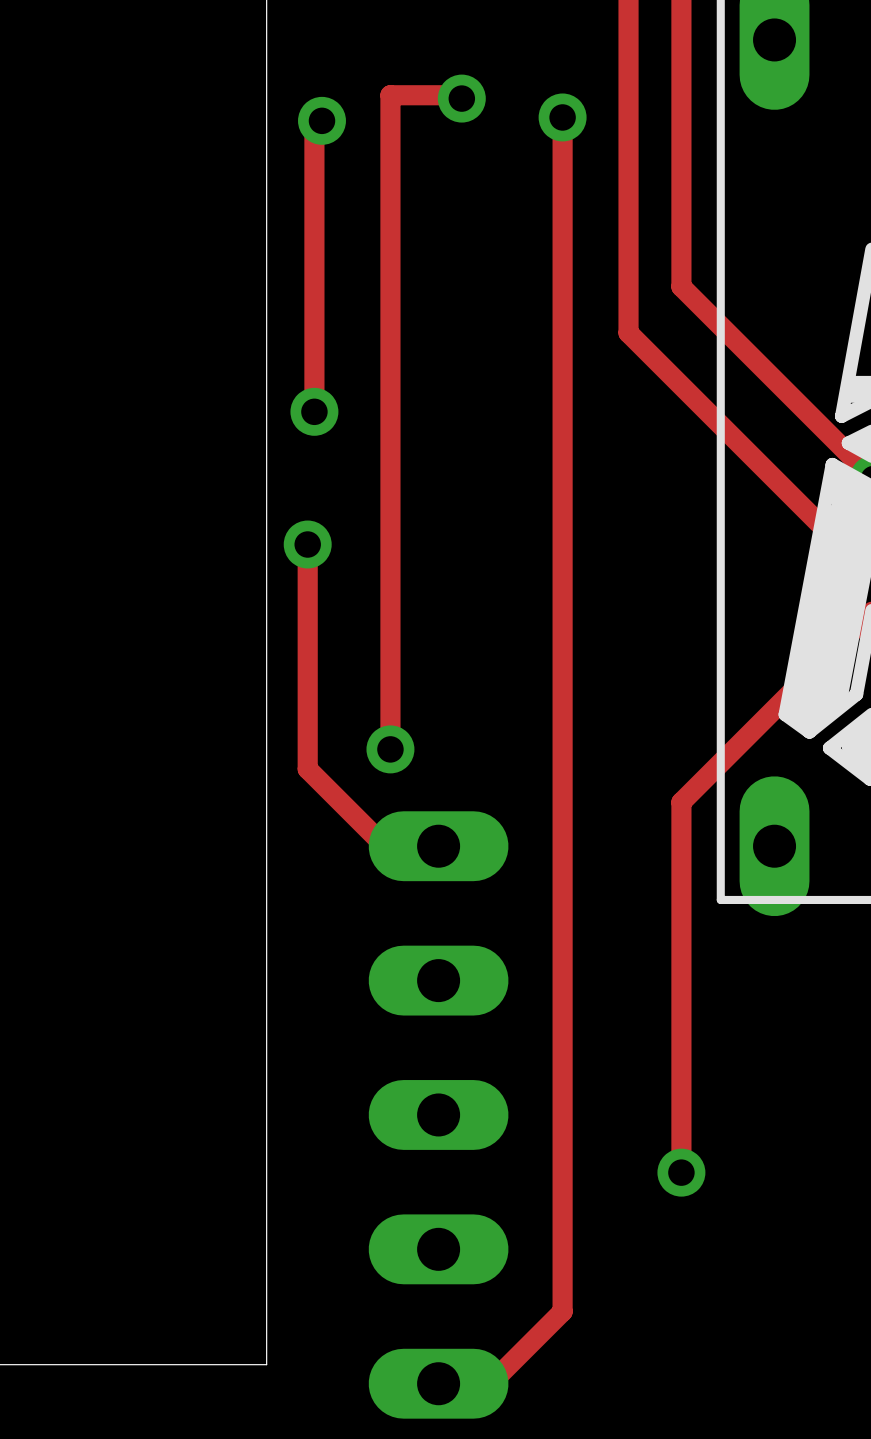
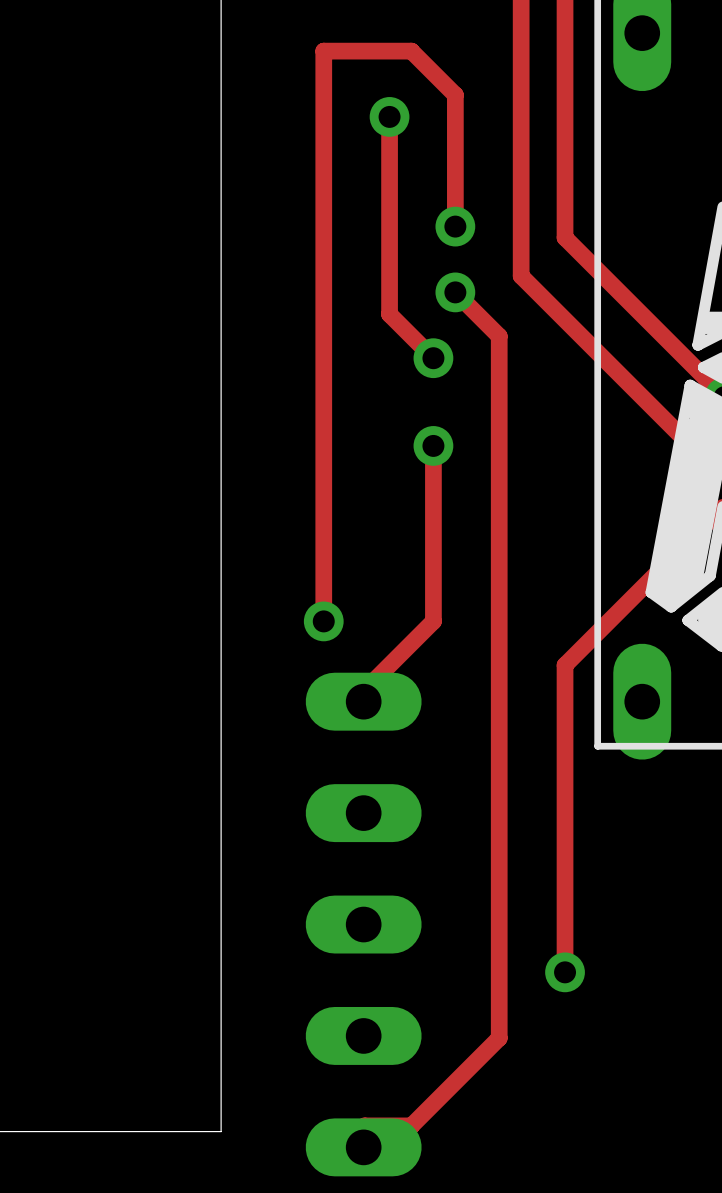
track: (390, 95) (458, 95) (461, 98) -> (323, 78) (323, 51) (411, 51) (455, 94) (455, 226)
via position: (461, 98) -> (389, 116)
track: (562, 117) (562, 1311) (490, 1383) (438, 1383) -> (455, 292) (499, 336) (499, 1038) (411, 1125) (364, 1125) (363, 1147)
via: (562, 117) -> none
track: (321, 120) (314, 128) (314, 411) -> none
via: (321, 120) -> none
track: none -> (389, 116) (389, 314) (433, 358)
via: none -> (455, 226)
via: none -> (455, 292)
via: (314, 411) -> none
via: none -> (433, 358)
via: none -> (433, 445)
track: (307, 544) (307, 769) (384, 846) (438, 846) -> (433, 445) (433, 621) (364, 690) (363, 701)
via: (307, 544) -> none

